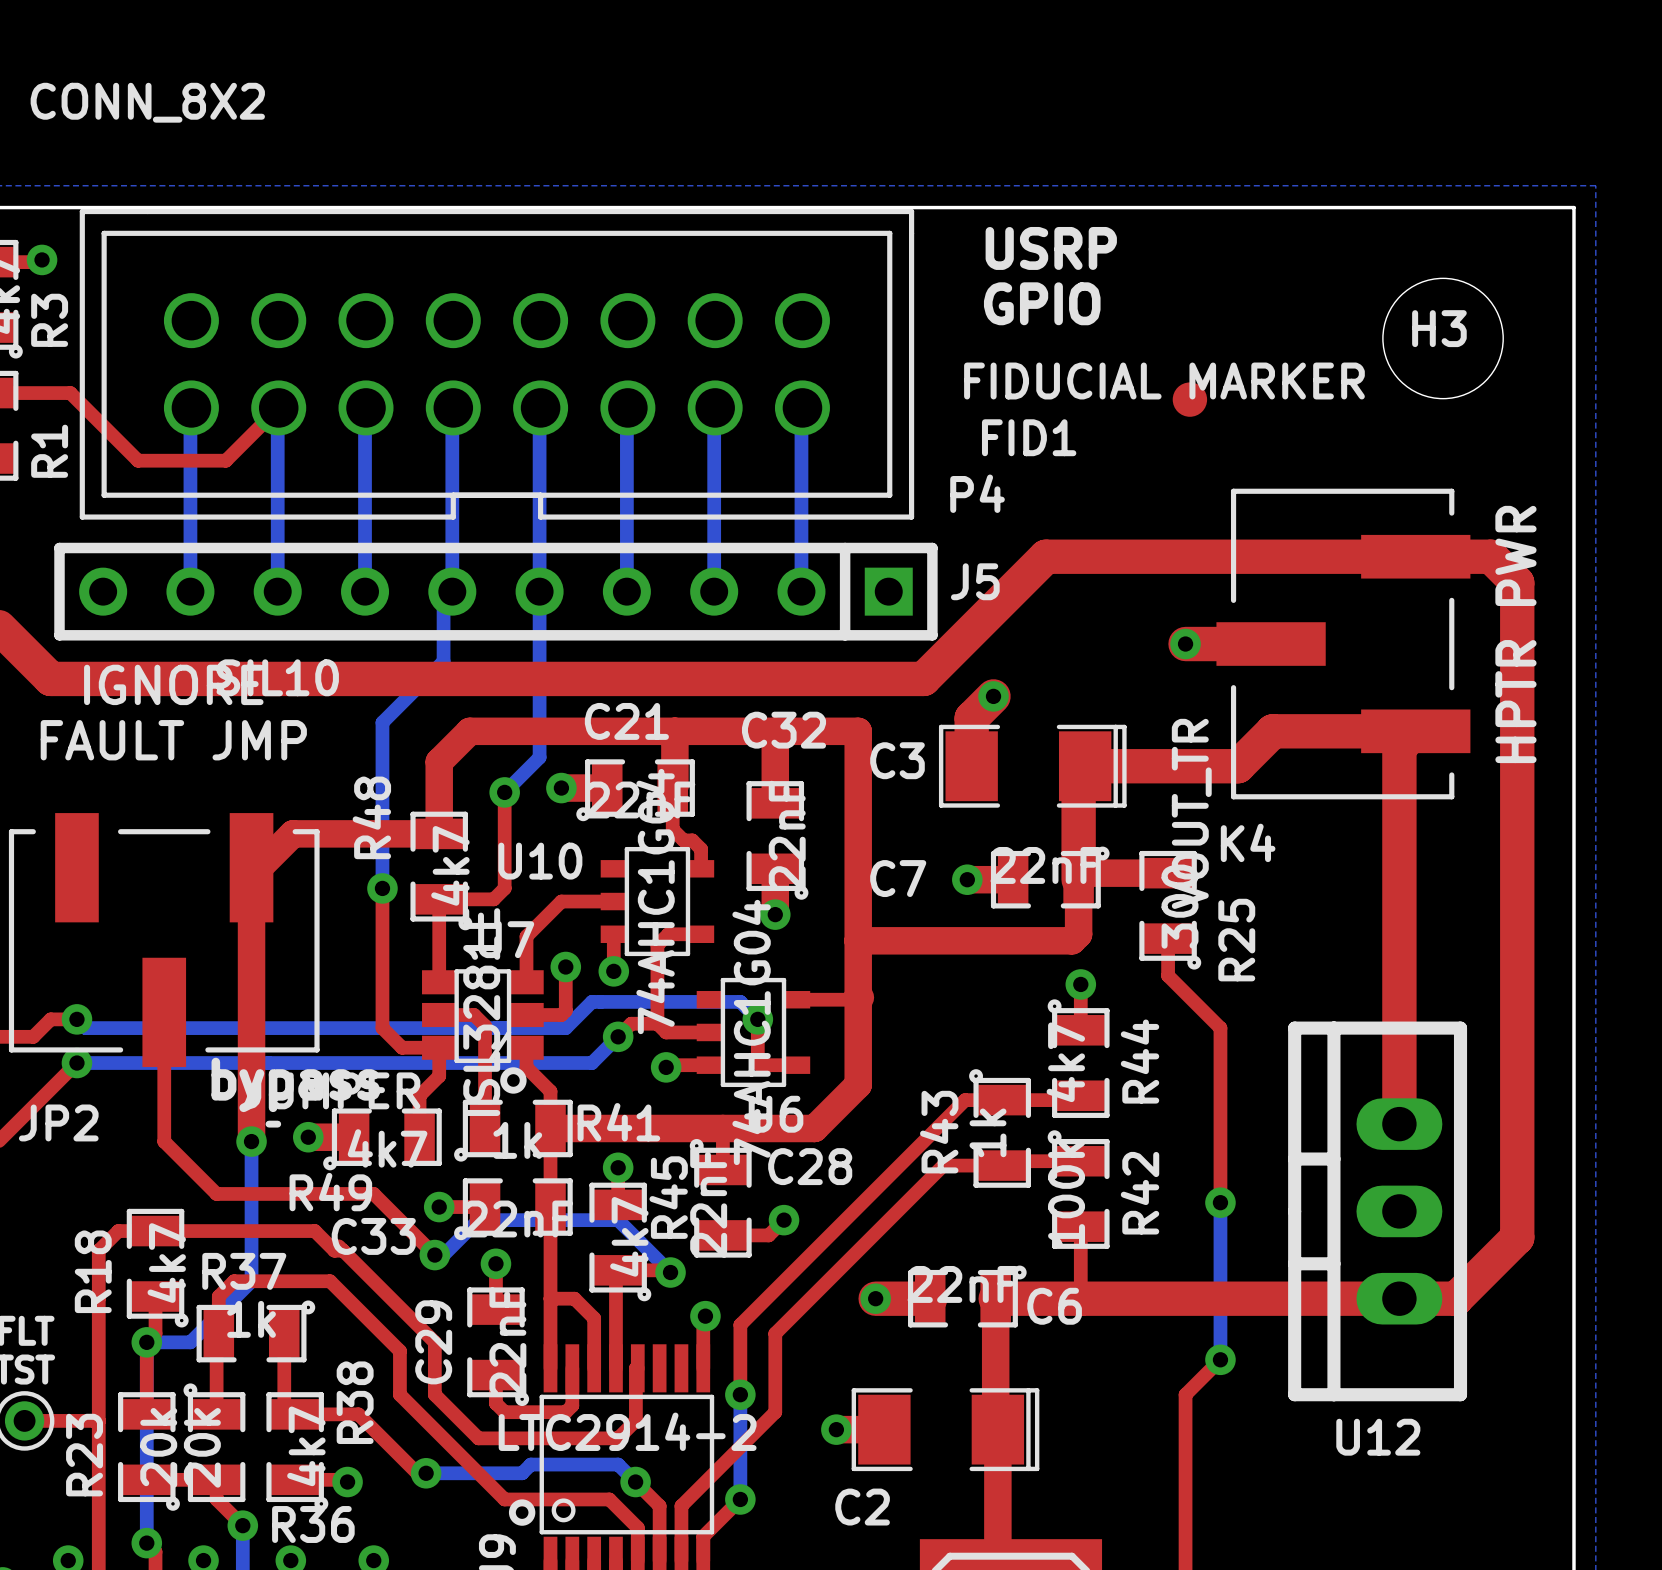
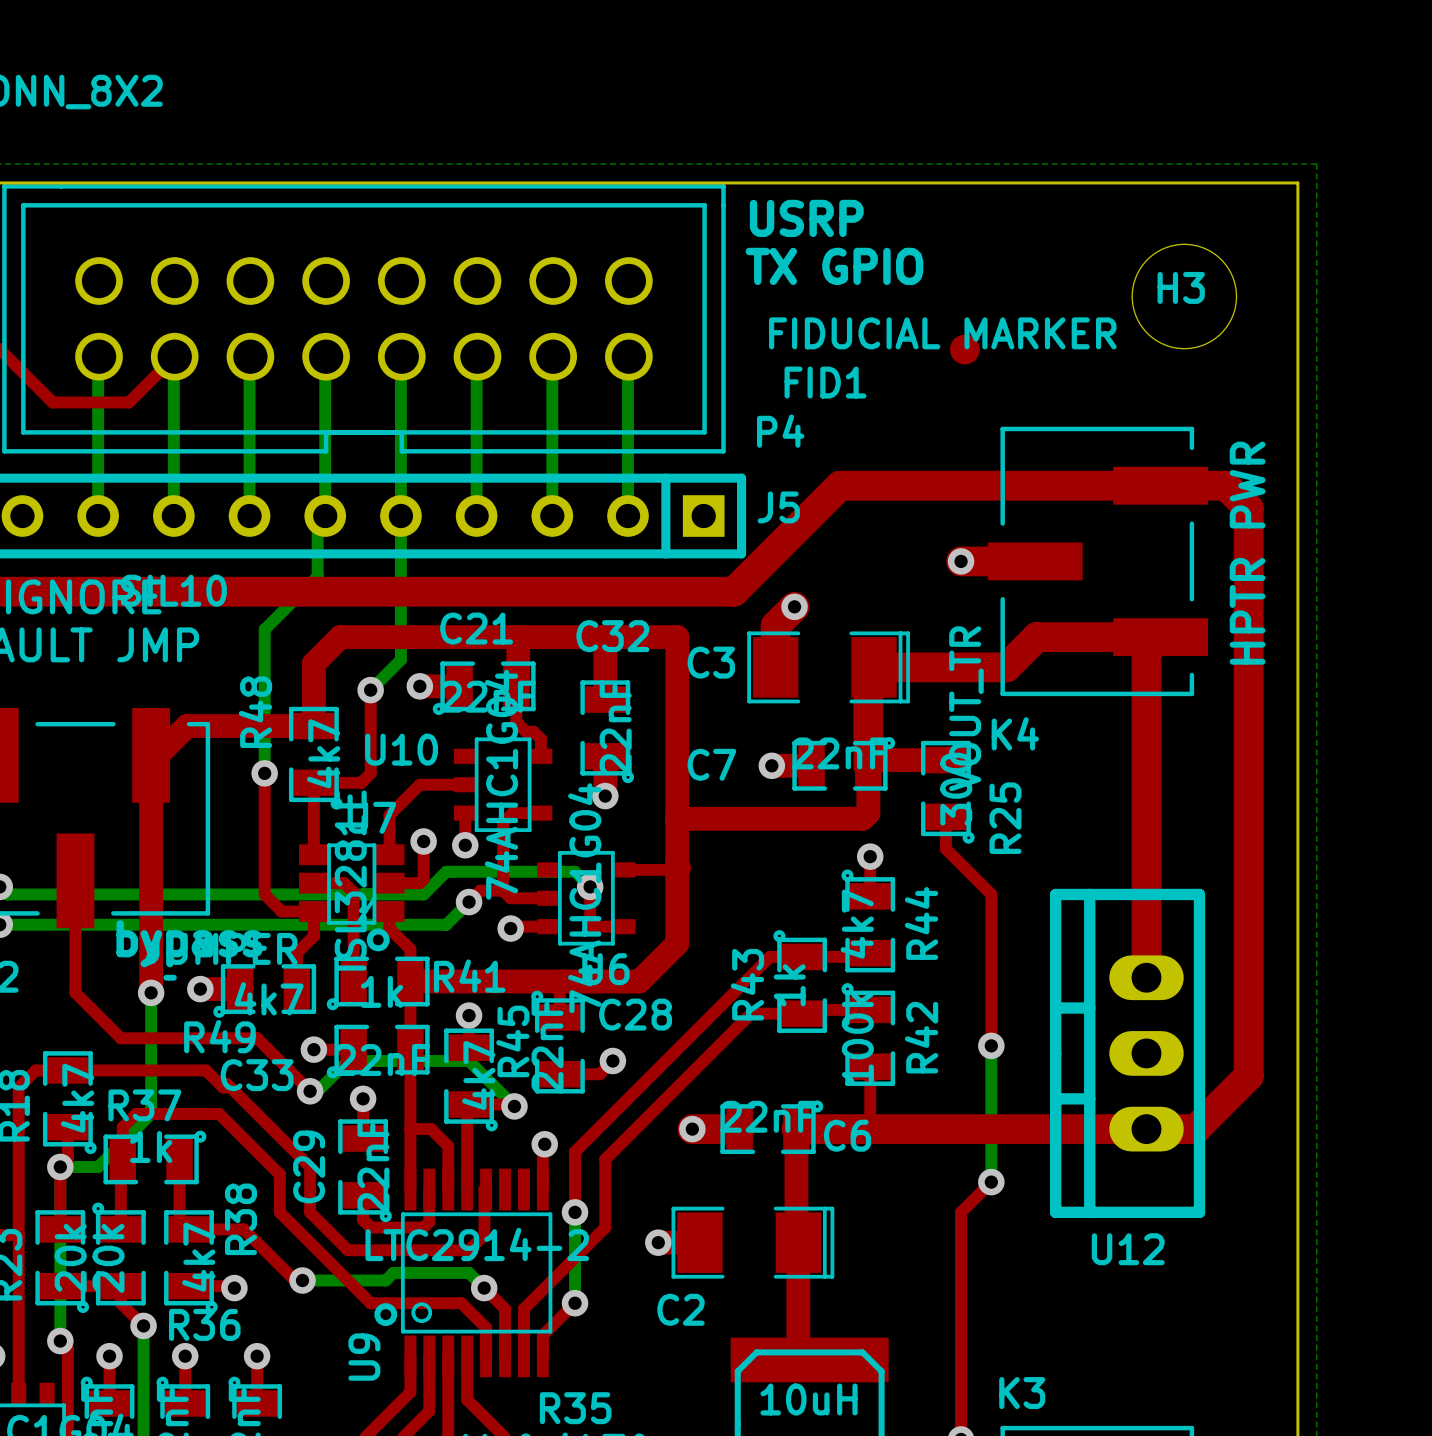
text position: USRP (1051, 248) -> USRP (806, 218)
text: GPIO (1042, 303) -> TX GPIO (834, 266)

